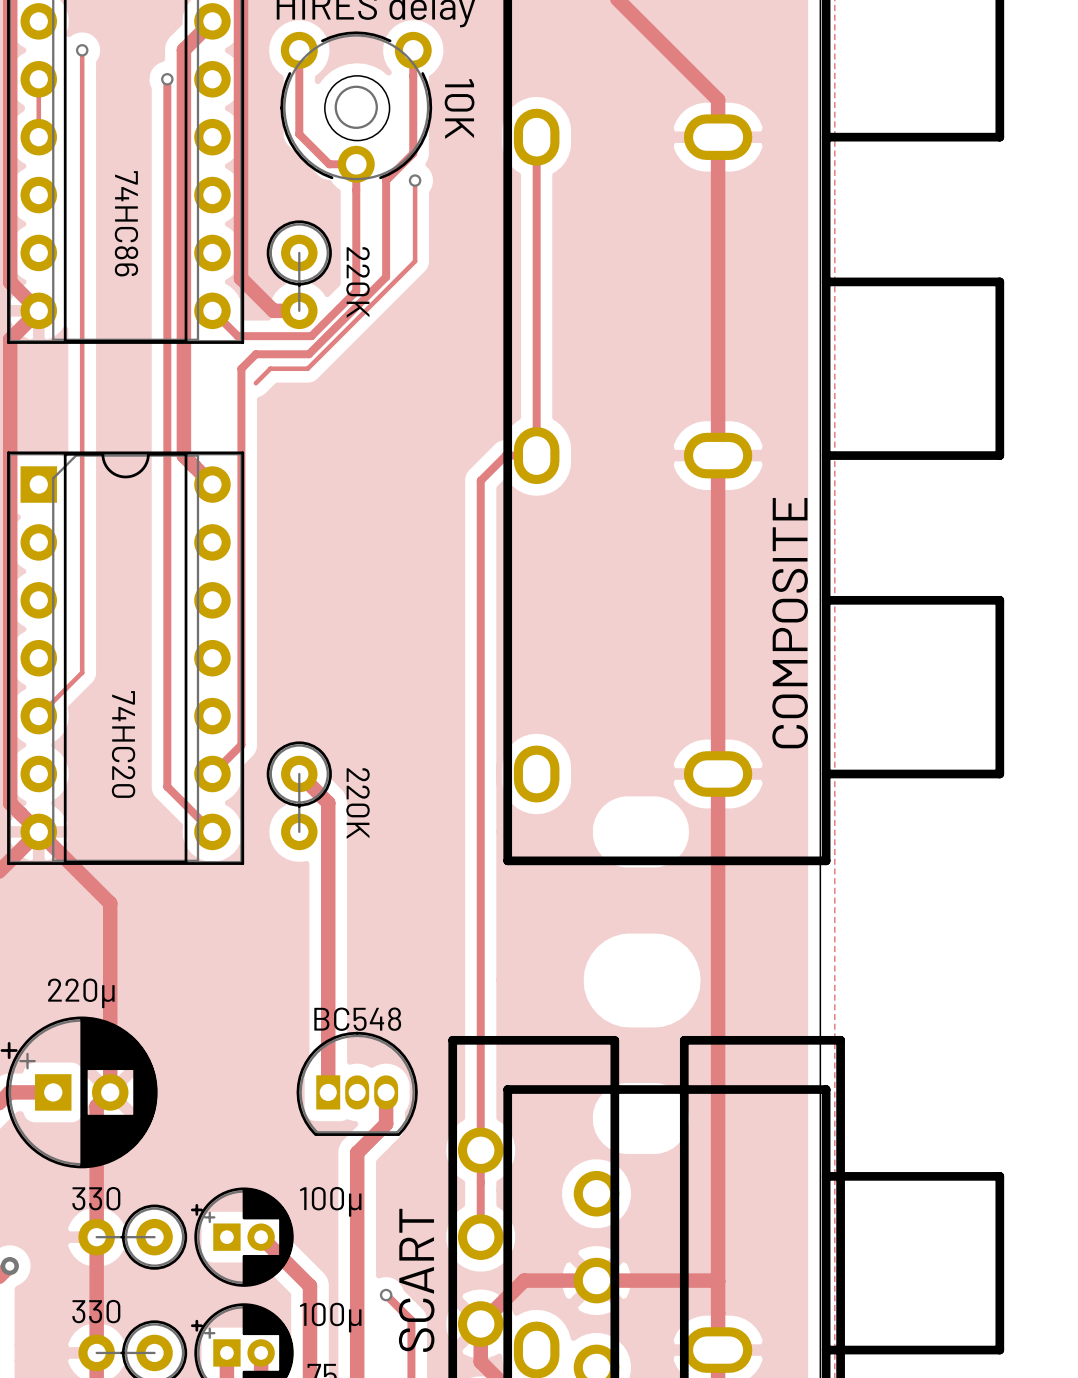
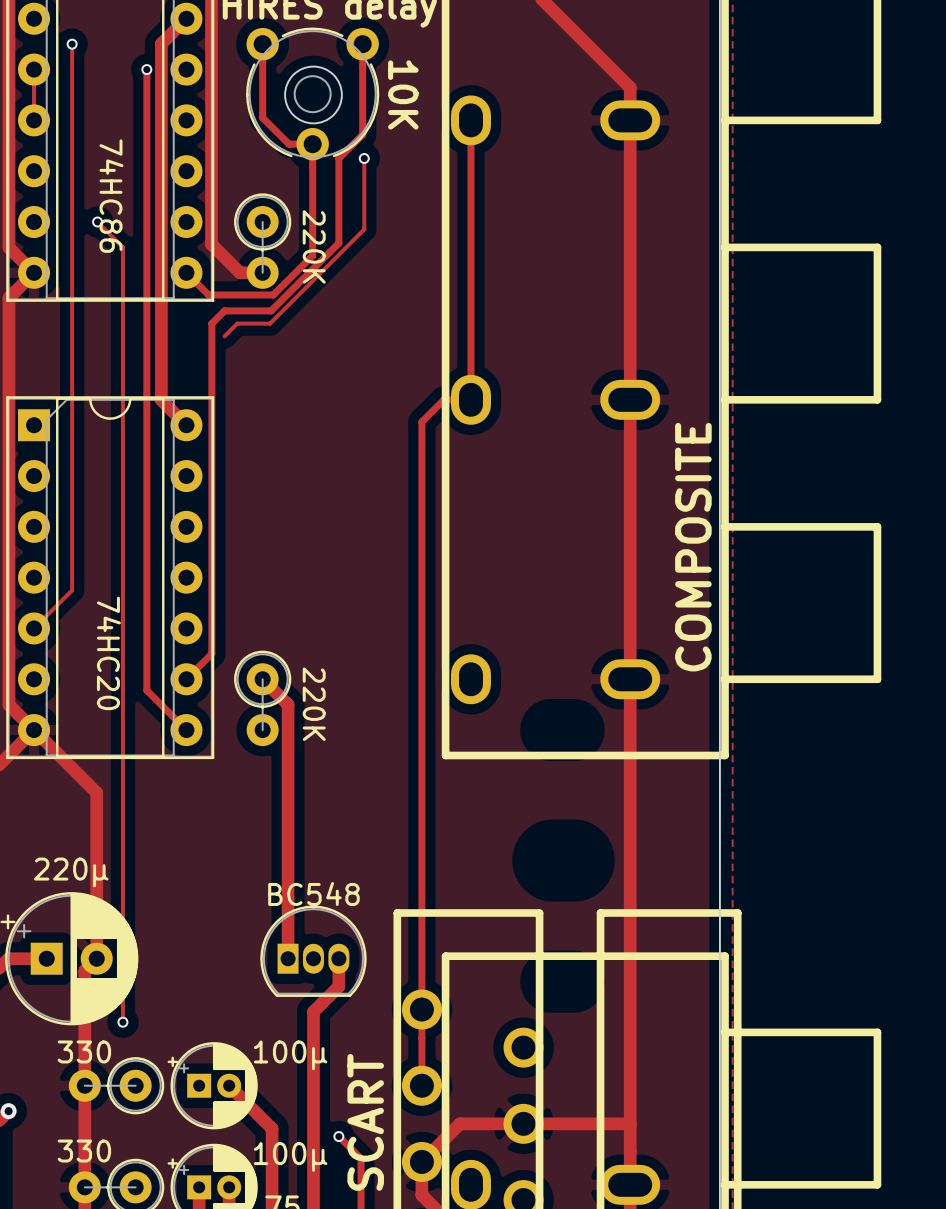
track: none -> (97, 221) (122, 247) (122, 1022)
via: none -> (97, 221)
via: none -> (122, 1022)

